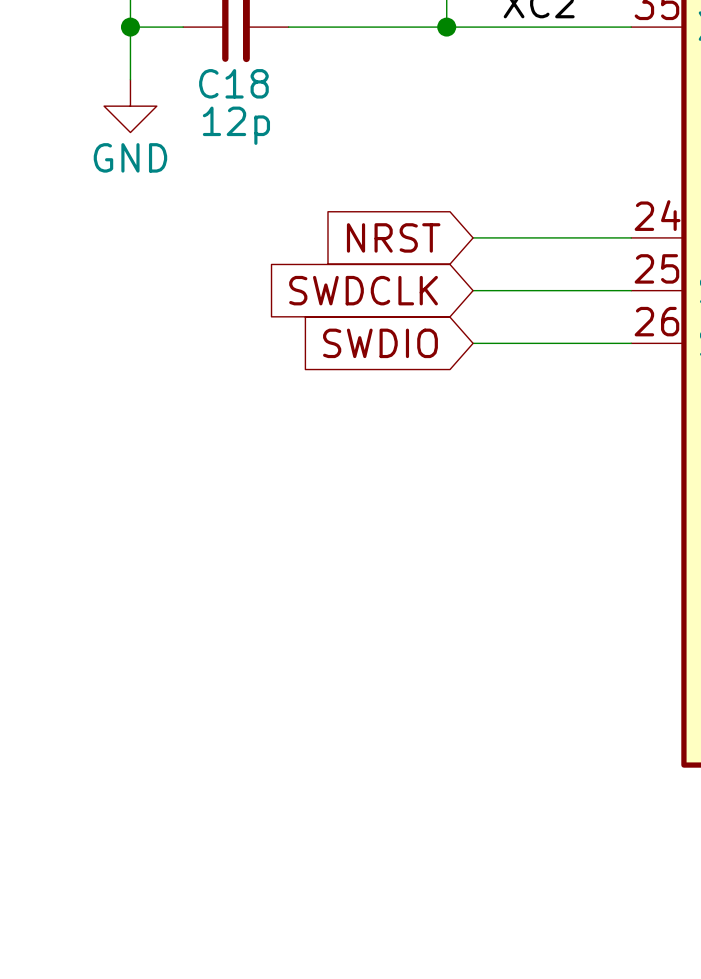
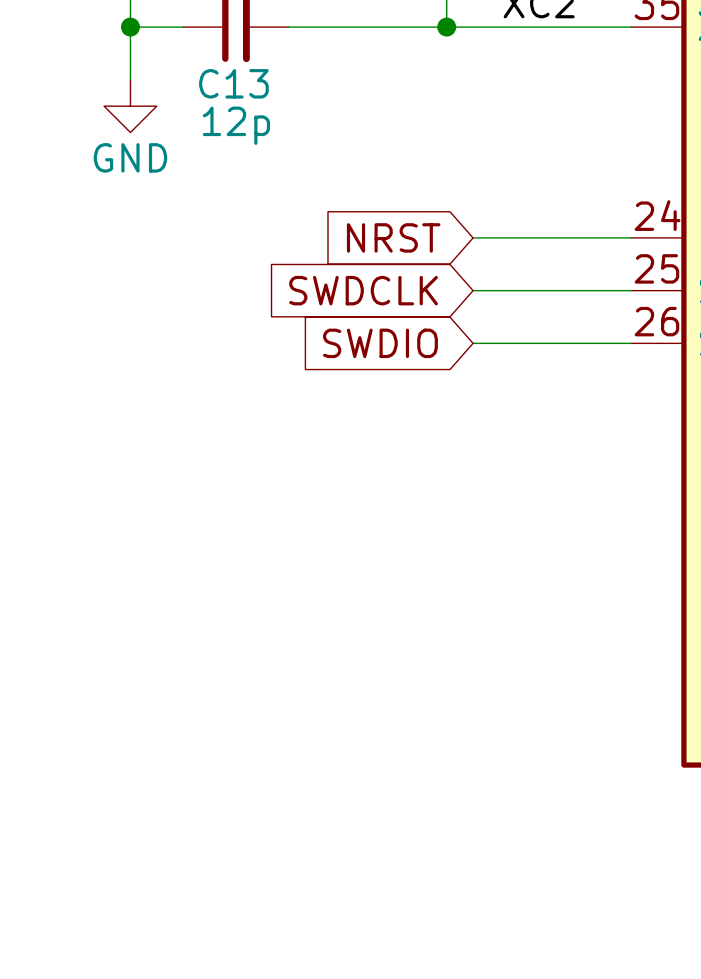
C18 name: C18 (233, 83) -> C13 (233, 83)

